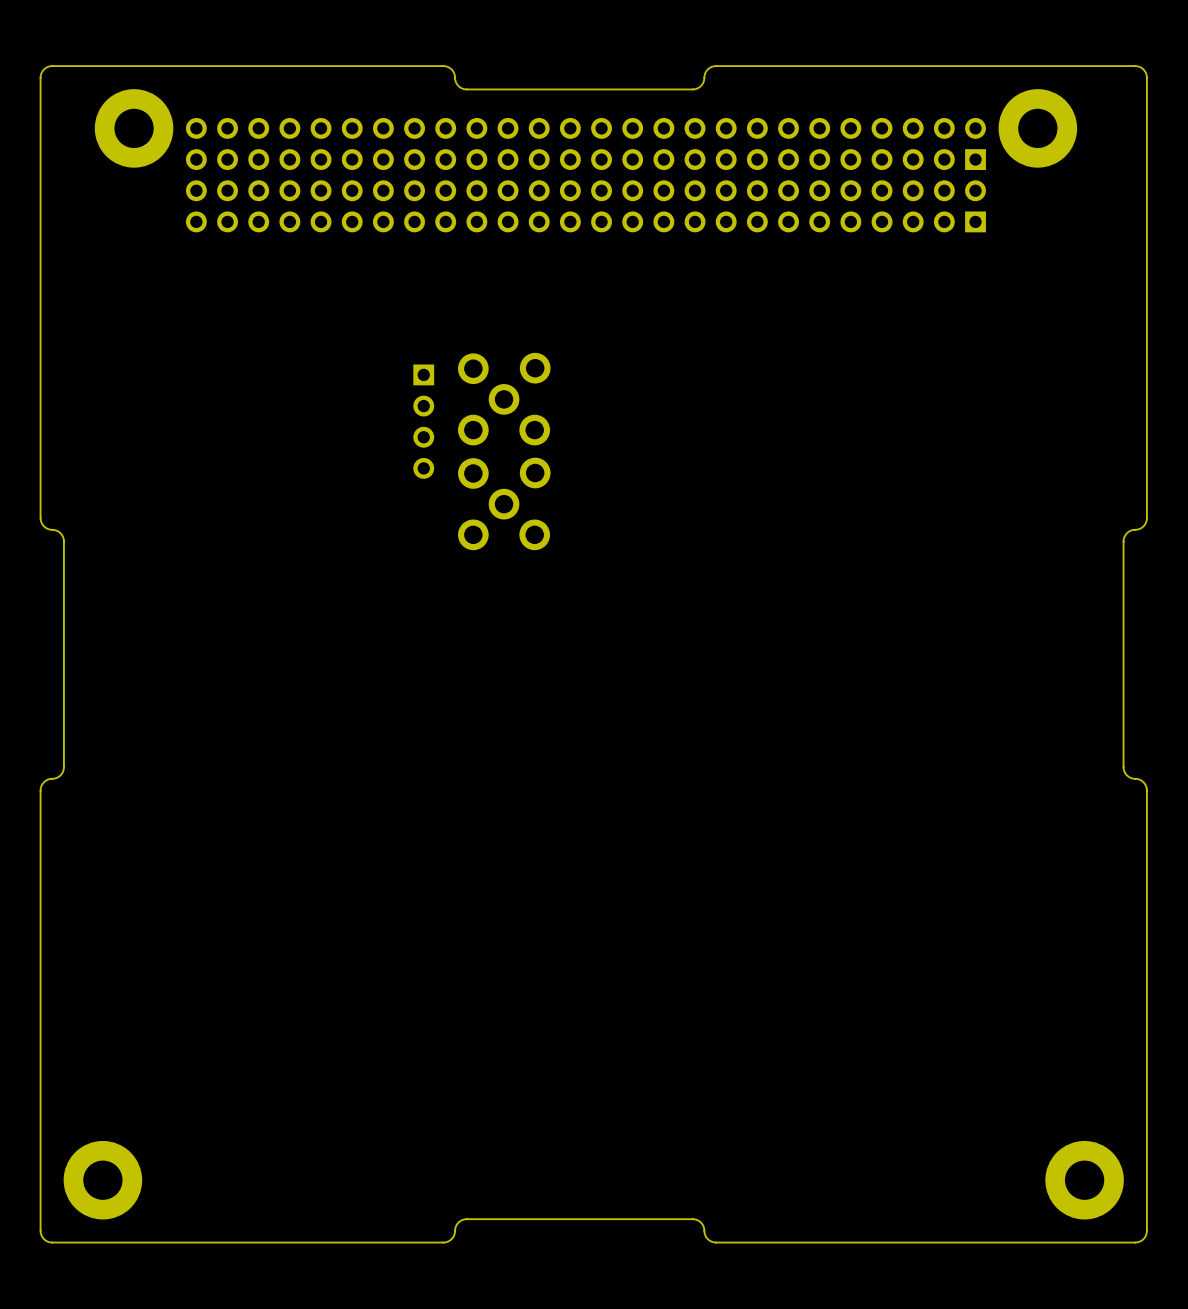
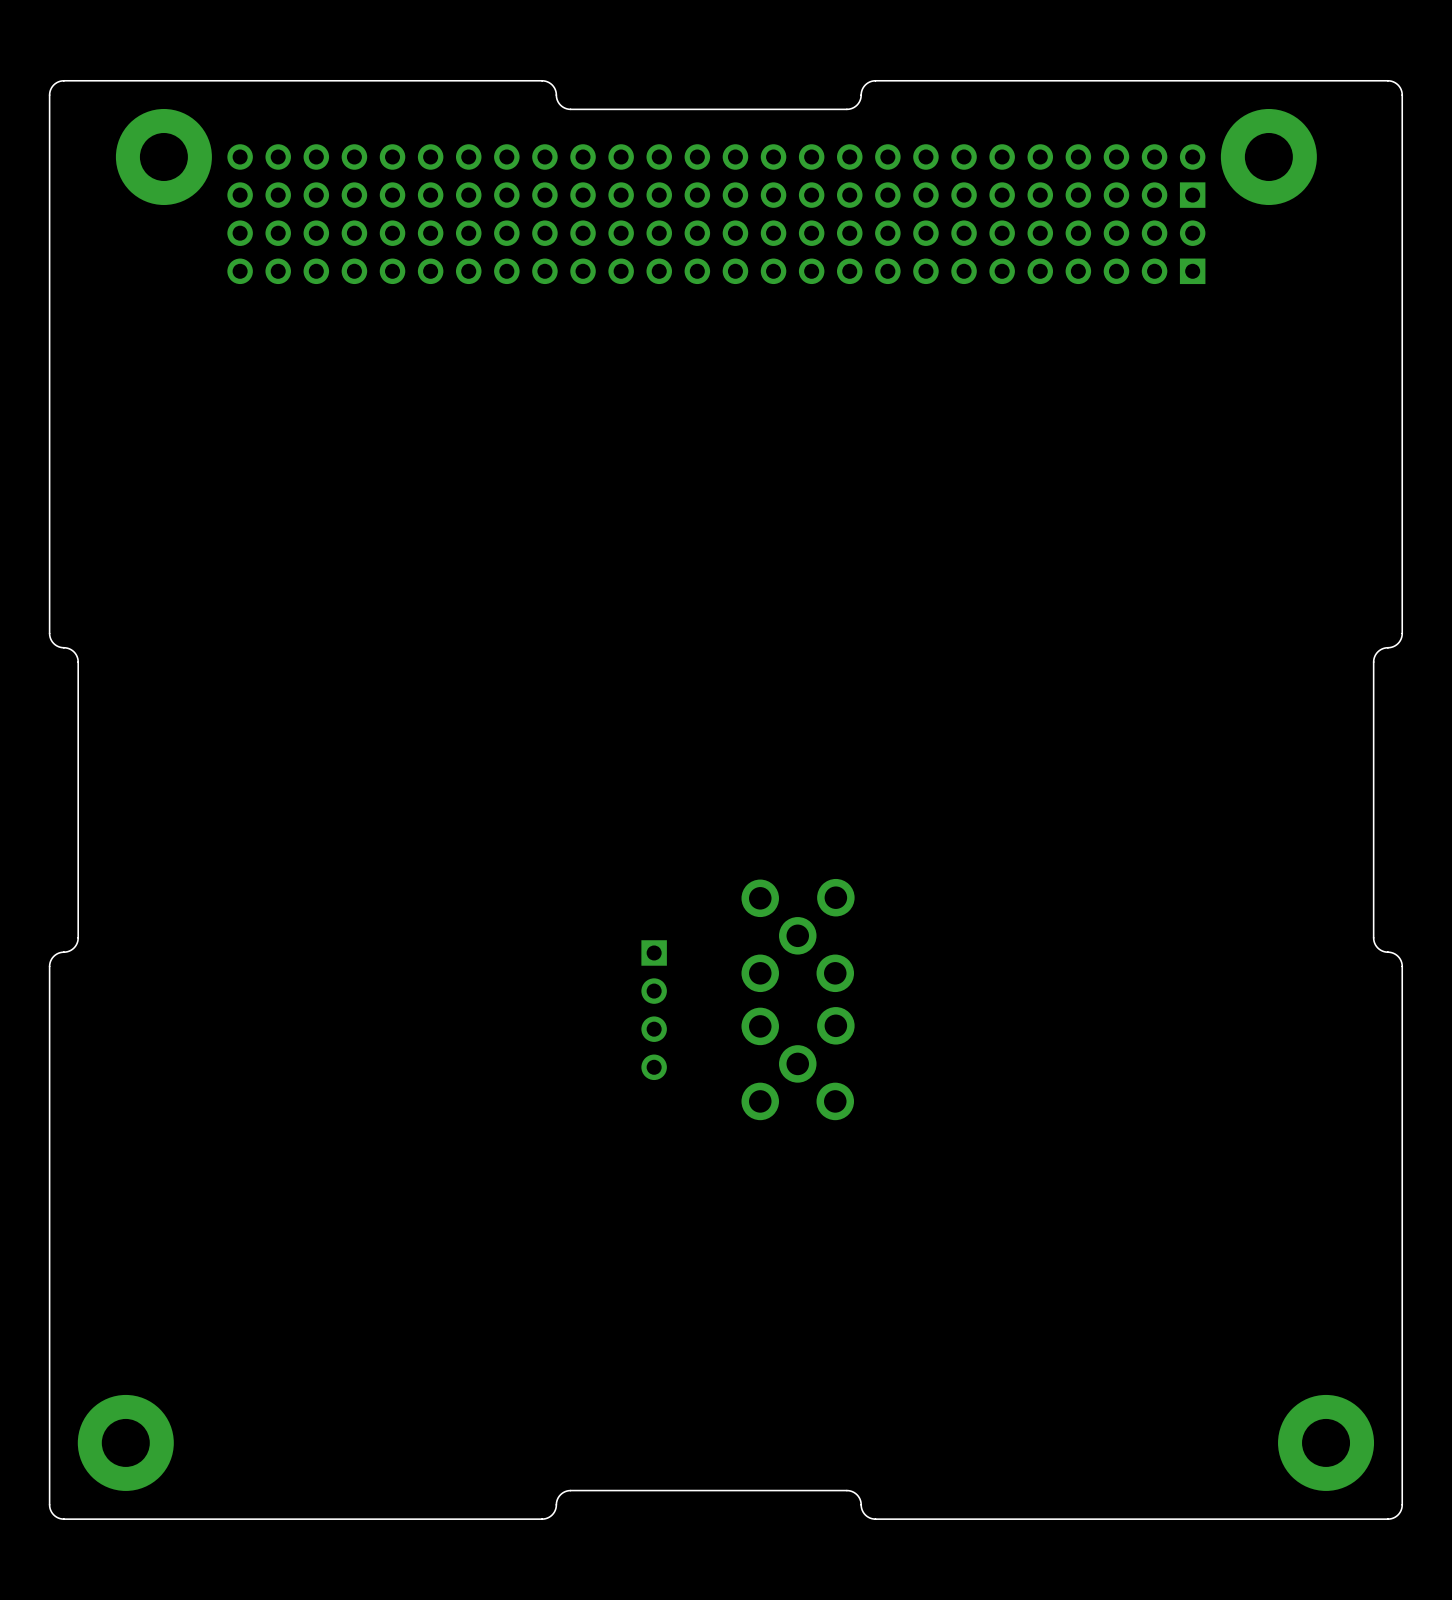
part: (504, 399) -> none
part: (423, 421) -> none
part: (504, 503) -> none
part: none -> (798, 935)
part: none -> (654, 1010)
part: none -> (798, 1063)

